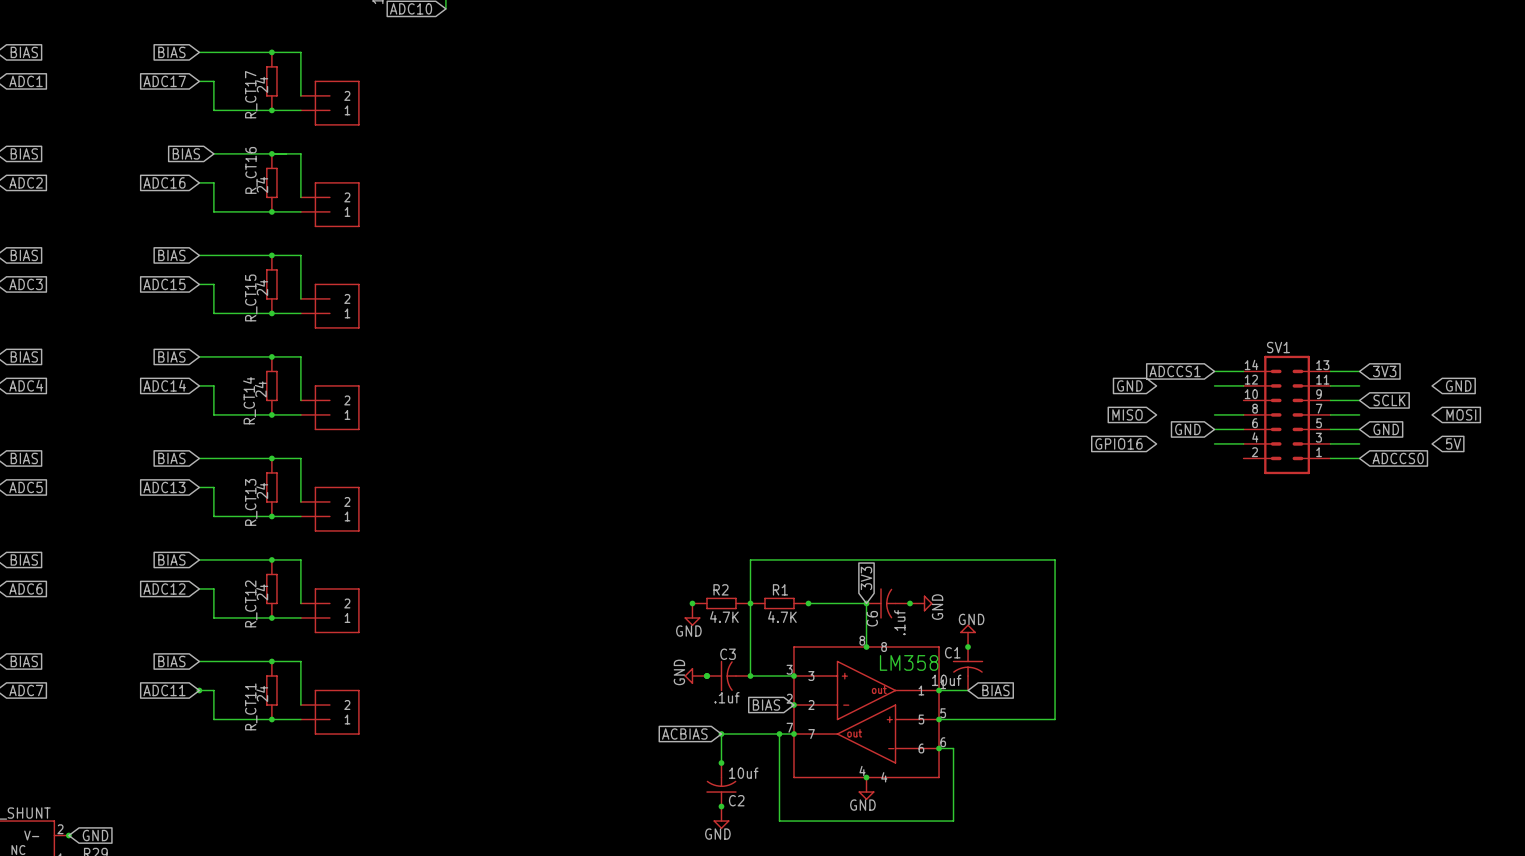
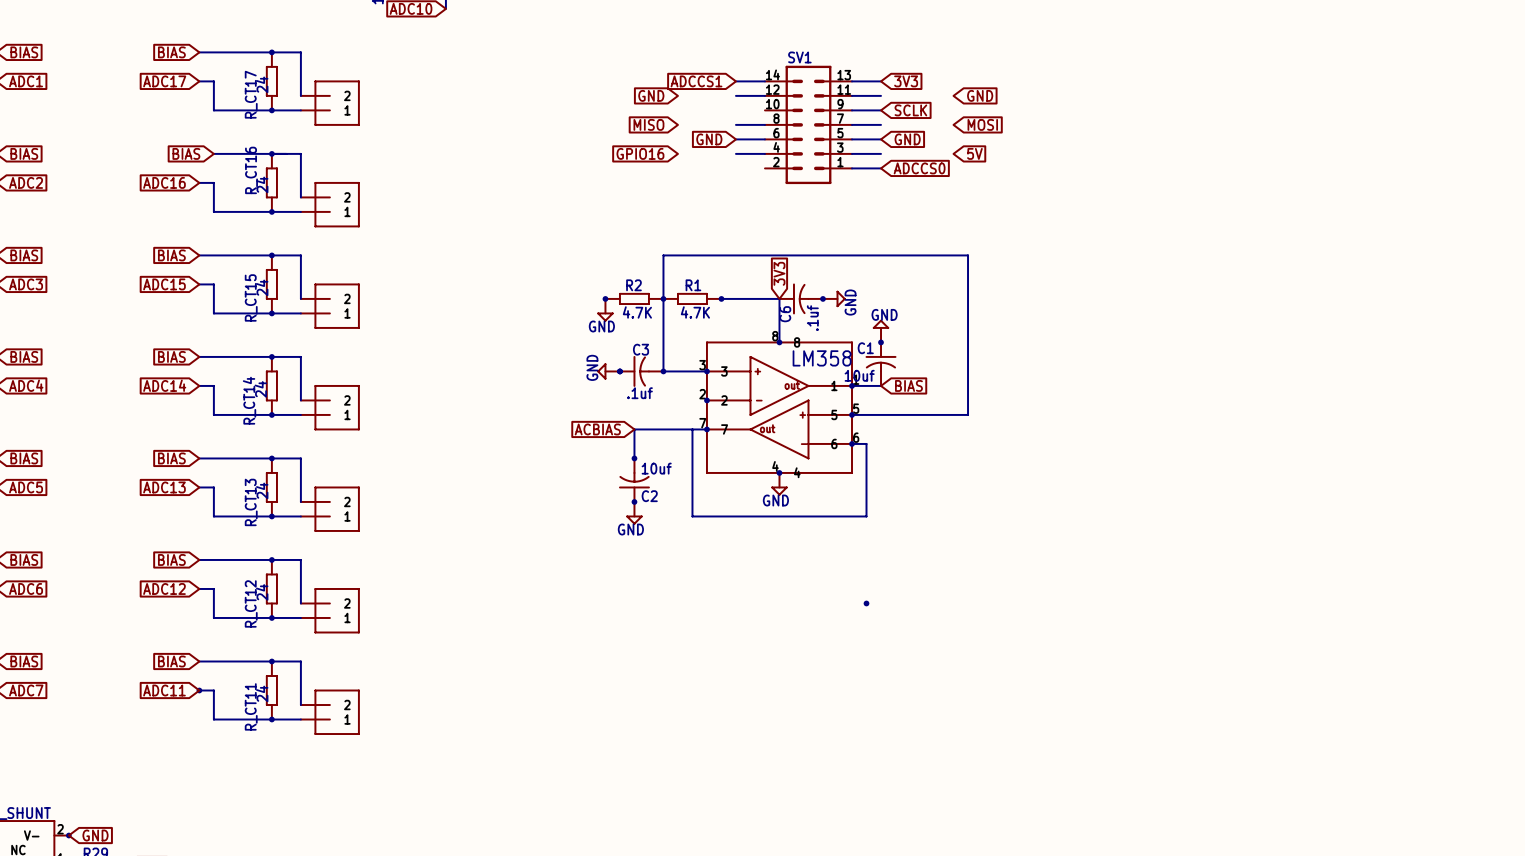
global label: none -> ADCCS1 (696, 81)
wire: none -> (735, 81) (764, 81)
wire: none -> (852, 81) (881, 81)
global label: none -> 3V3 (906, 81)
global label: none -> GND (651, 95)
wire: none -> (735, 95) (764, 95)
wire: none -> (852, 95) (881, 95)
global label: none -> GND (980, 95)
wire: none -> (852, 110) (881, 110)
global label: none -> SCLK (910, 110)
global label: none -> MISO (648, 124)
wire: none -> (735, 124) (764, 124)
wire: none -> (852, 124) (881, 124)
global label: none -> MOSI (982, 124)
global label: none -> GND (709, 139)
wire: none -> (735, 139) (764, 139)
wire: none -> (852, 139) (881, 139)
global label: none -> GND (907, 139)
global label: none -> GPIO16 (640, 153)
wire: none -> (735, 153) (764, 153)
wire: none -> (852, 153) (881, 153)
global label: none -> 5V (974, 153)
wire: none -> (852, 168) (881, 168)
global label: none -> ADCCS0 (919, 168)
global label: none -> 3V3 (779, 273)
junction: none -> (605, 298)
junction: none -> (663, 298)
wire: none -> (721, 298) (779, 298) (779, 342)
junction: none -> (721, 298)
junction: none -> (822, 298)
power symbol: none -> GND (834, 298)
power symbol: none -> GND (605, 310)
power symbol: none -> GND (881, 331)
junction: none -> (779, 342)
junction: none -> (881, 342)
text: none -> LM358 (822, 358)
power symbol: none -> GND (608, 371)
junction: none -> (619, 371)
junction: none -> (663, 371)
wire: none -> (706, 371) (663, 371) (663, 255) (968, 255) (968, 414) (852, 414)
junction: none -> (706, 371)
global label: ADCCS1 (1175, 371) -> none
wire: (1214, 371) (1243, 371) -> none
wire: (1330, 371) (1359, 371) -> none
global label: 3V3 (1384, 371) -> none
wire: none -> (852, 385) (881, 385)
junction: none -> (852, 385)
global label: none -> BIAS (908, 385)
global label: GND (1129, 385) -> none
wire: (1214, 385) (1243, 385) -> none
wire: (1330, 385) (1359, 385) -> none
global label: GND (1458, 385) -> none
junction: none -> (706, 400)
wire: (1330, 400) (1359, 400) -> none
global label: SCLK (1389, 400) -> none
part: none -> (779, 407)
junction: none -> (852, 414)
global label: MISO (1127, 414) -> none
wire: (1214, 414) (1243, 414) -> none
SV1 position: (1287, 414) -> (808, 124)
wire: (1330, 414) (1359, 414) -> none
global label: MOSI (1461, 414) -> none
global label: none -> ACBIAS (597, 429)
wire: none -> (692, 429) (692, 516) (866, 516) (866, 443) (852, 443)
wire: none -> (706, 429) (634, 429) (634, 458)
junction: none -> (706, 429)
global label: GND (1187, 429) -> none
wire: (1214, 429) (1243, 429) -> none
wire: (1330, 429) (1359, 429) -> none
global label: GND (1386, 429) -> none
junction: none -> (852, 443)
global label: GPIO16 (1119, 443) -> none
wire: (1214, 443) (1243, 443) -> none
wire: (1330, 443) (1359, 443) -> none
global label: 5V (1453, 443) -> none
junction: none -> (634, 458)
wire: (1330, 458) (1359, 458) -> none
global label: ADCCS0 (1398, 458) -> none
junction: none -> (779, 472)
power symbol: none -> GND (779, 484)
junction: none -> (634, 501)
power symbol: none -> GND (634, 513)
global label: 3V3 (866, 578) -> none
junction: (692, 603) -> none
R2 position: (721, 603) -> (634, 298)
junction: (750, 603) -> none
R1 position: (779, 603) -> (692, 298)
wire: (808, 603) (866, 603) (866, 646) -> none
junction: (808, 603) -> none
C6 position: (888, 603) -> (801, 298)
junction: (910, 603) -> none
power symbol: GND (921, 603) -> none
power symbol: GND (692, 614) -> none
power symbol: GND (968, 635) -> none
junction: (866, 646) -> none
junction: (968, 646) -> none
text: LM358 (909, 662) -> none
C1 position: (968, 668) -> (881, 364)
power symbol: GND (695, 676) -> none
junction: (706, 676) -> none
C3 position: (728, 676) -> (641, 371)
junction: (750, 676) -> none
wire: (793, 676) (750, 676) (750, 559) (1055, 559) (1055, 719) (939, 719) -> none
junction: (793, 676) -> none
wire: (939, 690) (968, 690) -> none
junction: (939, 690) -> none
global label: BIAS (995, 690) -> none
global label: BIAS (766, 705) -> none
junction: (793, 705) -> none
part: (866, 712) -> none
junction: (939, 719) -> none
global label: ACBIAS (684, 734) -> none
junction: (721, 734) -> none
wire: (779, 734) (779, 821) (953, 821) (953, 748) (939, 748) -> none
junction: (779, 734) -> none
wire: (793, 734) (721, 734) (721, 763) -> none
junction: (793, 734) -> none
junction: (939, 748) -> none
junction: (721, 763) -> none
junction: (866, 777) -> none
C2 position: (721, 784) -> (634, 480)
power symbol: GND (866, 788) -> none
junction: (721, 806) -> none
power symbol: GND (721, 817) -> none

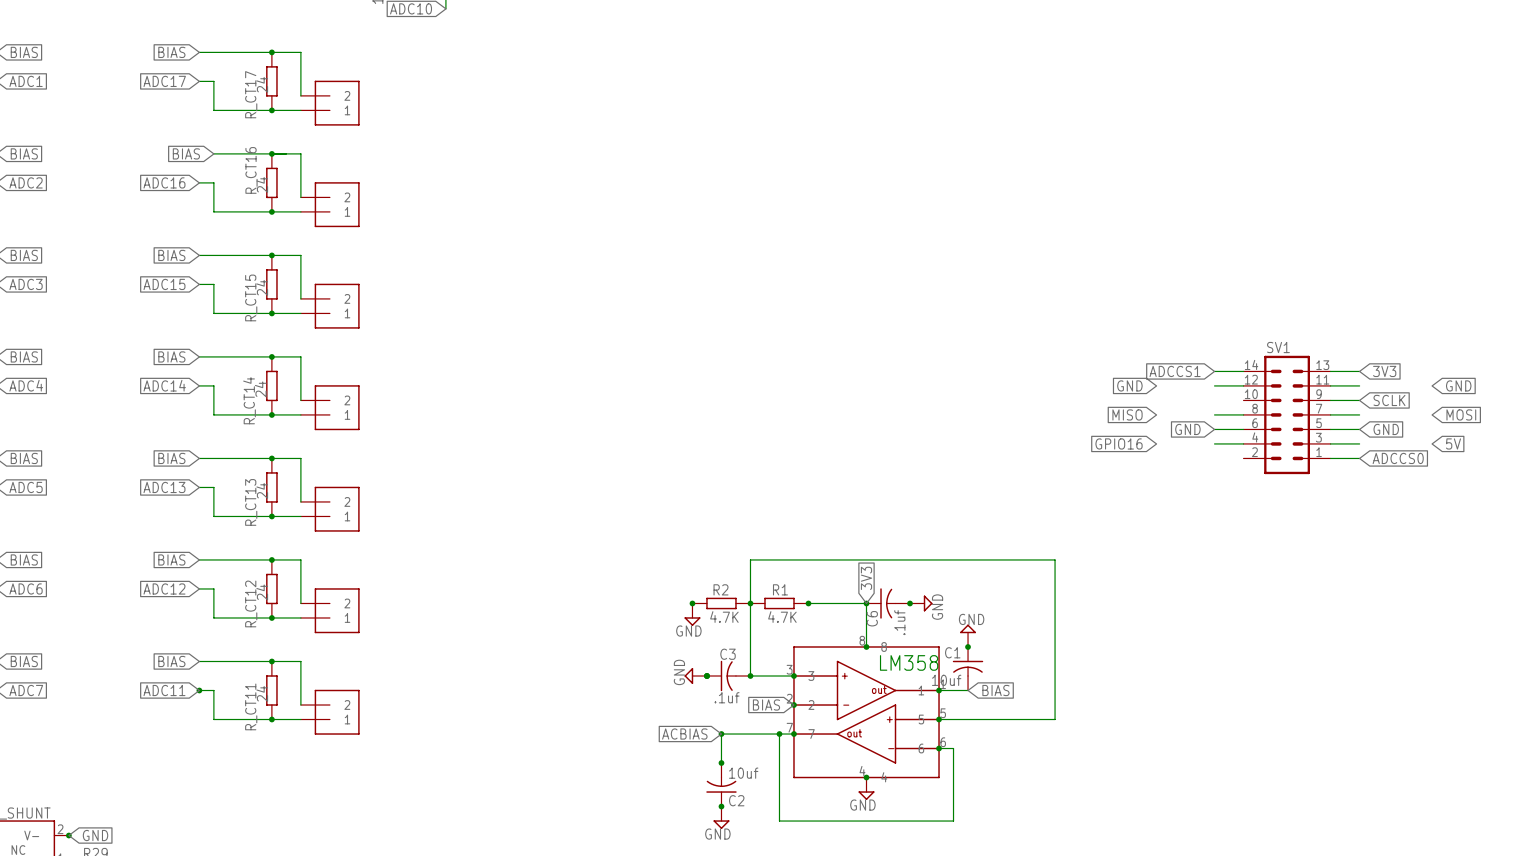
global label: ADCCS1 (696, 81) -> none
wire: (735, 81) (764, 81) -> none
wire: (852, 81) (881, 81) -> none
global label: 3V3 (906, 81) -> none
global label: GND (651, 95) -> none
wire: (735, 95) (764, 95) -> none
wire: (852, 95) (881, 95) -> none
global label: GND (980, 95) -> none
wire: (852, 110) (881, 110) -> none
global label: SCLK (910, 110) -> none
global label: MISO (648, 124) -> none
wire: (735, 124) (764, 124) -> none
SV1 position: (808, 124) -> (1287, 414)
wire: (852, 124) (881, 124) -> none
global label: MOSI (982, 124) -> none
global label: GND (709, 139) -> none
wire: (735, 139) (764, 139) -> none
wire: (852, 139) (881, 139) -> none
global label: GND (907, 139) -> none
global label: GPIO16 (640, 153) -> none
wire: (735, 153) (764, 153) -> none
wire: (852, 153) (881, 153) -> none
global label: 5V (974, 153) -> none
wire: (852, 168) (881, 168) -> none
global label: ADCCS0 (919, 168) -> none
global label: 3V3 (779, 273) -> none
junction: (605, 298) -> none
R2 position: (634, 298) -> (721, 603)
junction: (663, 298) -> none
R1 position: (692, 298) -> (779, 603)
wire: (721, 298) (779, 298) (779, 342) -> none
junction: (721, 298) -> none
C6 position: (801, 298) -> (888, 603)
junction: (822, 298) -> none
power symbol: GND (834, 298) -> none
power symbol: GND (605, 310) -> none
power symbol: GND (881, 331) -> none
junction: (779, 342) -> none
junction: (881, 342) -> none
text: LM358 (822, 358) -> none
C1 position: (881, 364) -> (968, 668)
power symbol: GND (608, 371) -> none
junction: (619, 371) -> none
C3 position: (641, 371) -> (728, 676)
junction: (663, 371) -> none
wire: (706, 371) (663, 371) (663, 255) (968, 255) (968, 414) (852, 414) -> none
junction: (706, 371) -> none
global label: none -> ADCCS1 (1175, 371)
wire: none -> (1214, 371) (1243, 371)
wire: none -> (1330, 371) (1359, 371)
global label: none -> 3V3 (1384, 371)
wire: (852, 385) (881, 385) -> none
junction: (852, 385) -> none
global label: BIAS (908, 385) -> none
global label: none -> GND (1129, 385)
wire: none -> (1214, 385) (1243, 385)
wire: none -> (1330, 385) (1359, 385)
global label: none -> GND (1458, 385)
junction: (706, 400) -> none
wire: none -> (1330, 400) (1359, 400)
global label: none -> SCLK (1389, 400)
part: (779, 407) -> none
junction: (852, 414) -> none
global label: none -> MISO (1127, 414)
wire: none -> (1214, 414) (1243, 414)
wire: none -> (1330, 414) (1359, 414)
global label: none -> MOSI (1461, 414)
global label: ACBIAS (597, 429) -> none
wire: (692, 429) (692, 516) (866, 516) (866, 443) (852, 443) -> none
wire: (706, 429) (634, 429) (634, 458) -> none
junction: (706, 429) -> none
global label: none -> GND (1187, 429)
wire: none -> (1214, 429) (1243, 429)
wire: none -> (1330, 429) (1359, 429)
global label: none -> GND (1386, 429)
junction: (852, 443) -> none
global label: none -> GPIO16 (1119, 443)
wire: none -> (1214, 443) (1243, 443)
wire: none -> (1330, 443) (1359, 443)
global label: none -> 5V (1453, 443)
junction: (634, 458) -> none
wire: none -> (1330, 458) (1359, 458)
global label: none -> ADCCS0 (1398, 458)
junction: (779, 472) -> none
C2 position: (634, 480) -> (721, 784)
power symbol: GND (779, 484) -> none
junction: (634, 501) -> none
power symbol: GND (634, 513) -> none
global label: none -> 3V3 (866, 578)
junction: none -> (692, 603)
junction: none -> (750, 603)
wire: none -> (808, 603) (866, 603) (866, 646)
junction: none -> (808, 603)
junction: none -> (910, 603)
power symbol: none -> GND (921, 603)
power symbol: none -> GND (692, 614)
power symbol: none -> GND (968, 635)
junction: none -> (866, 646)
junction: none -> (968, 646)
text: none -> LM358 (909, 662)
power symbol: none -> GND (695, 676)
junction: none -> (706, 676)
junction: none -> (750, 676)
wire: none -> (793, 676) (750, 676) (750, 559) (1055, 559) (1055, 719) (939, 719)
junction: none -> (793, 676)
wire: none -> (939, 690) (968, 690)
junction: none -> (939, 690)
global label: none -> BIAS (995, 690)
global label: none -> BIAS (766, 705)
junction: none -> (793, 705)
part: none -> (866, 712)
junction: none -> (939, 719)
global label: none -> ACBIAS (684, 734)
junction: none -> (721, 734)
wire: none -> (779, 734) (779, 821) (953, 821) (953, 748) (939, 748)
junction: none -> (779, 734)
wire: none -> (793, 734) (721, 734) (721, 763)
junction: none -> (793, 734)
junction: none -> (939, 748)
junction: none -> (721, 763)
junction: none -> (866, 777)
power symbol: none -> GND (866, 788)
junction: none -> (721, 806)
power symbol: none -> GND (721, 817)

